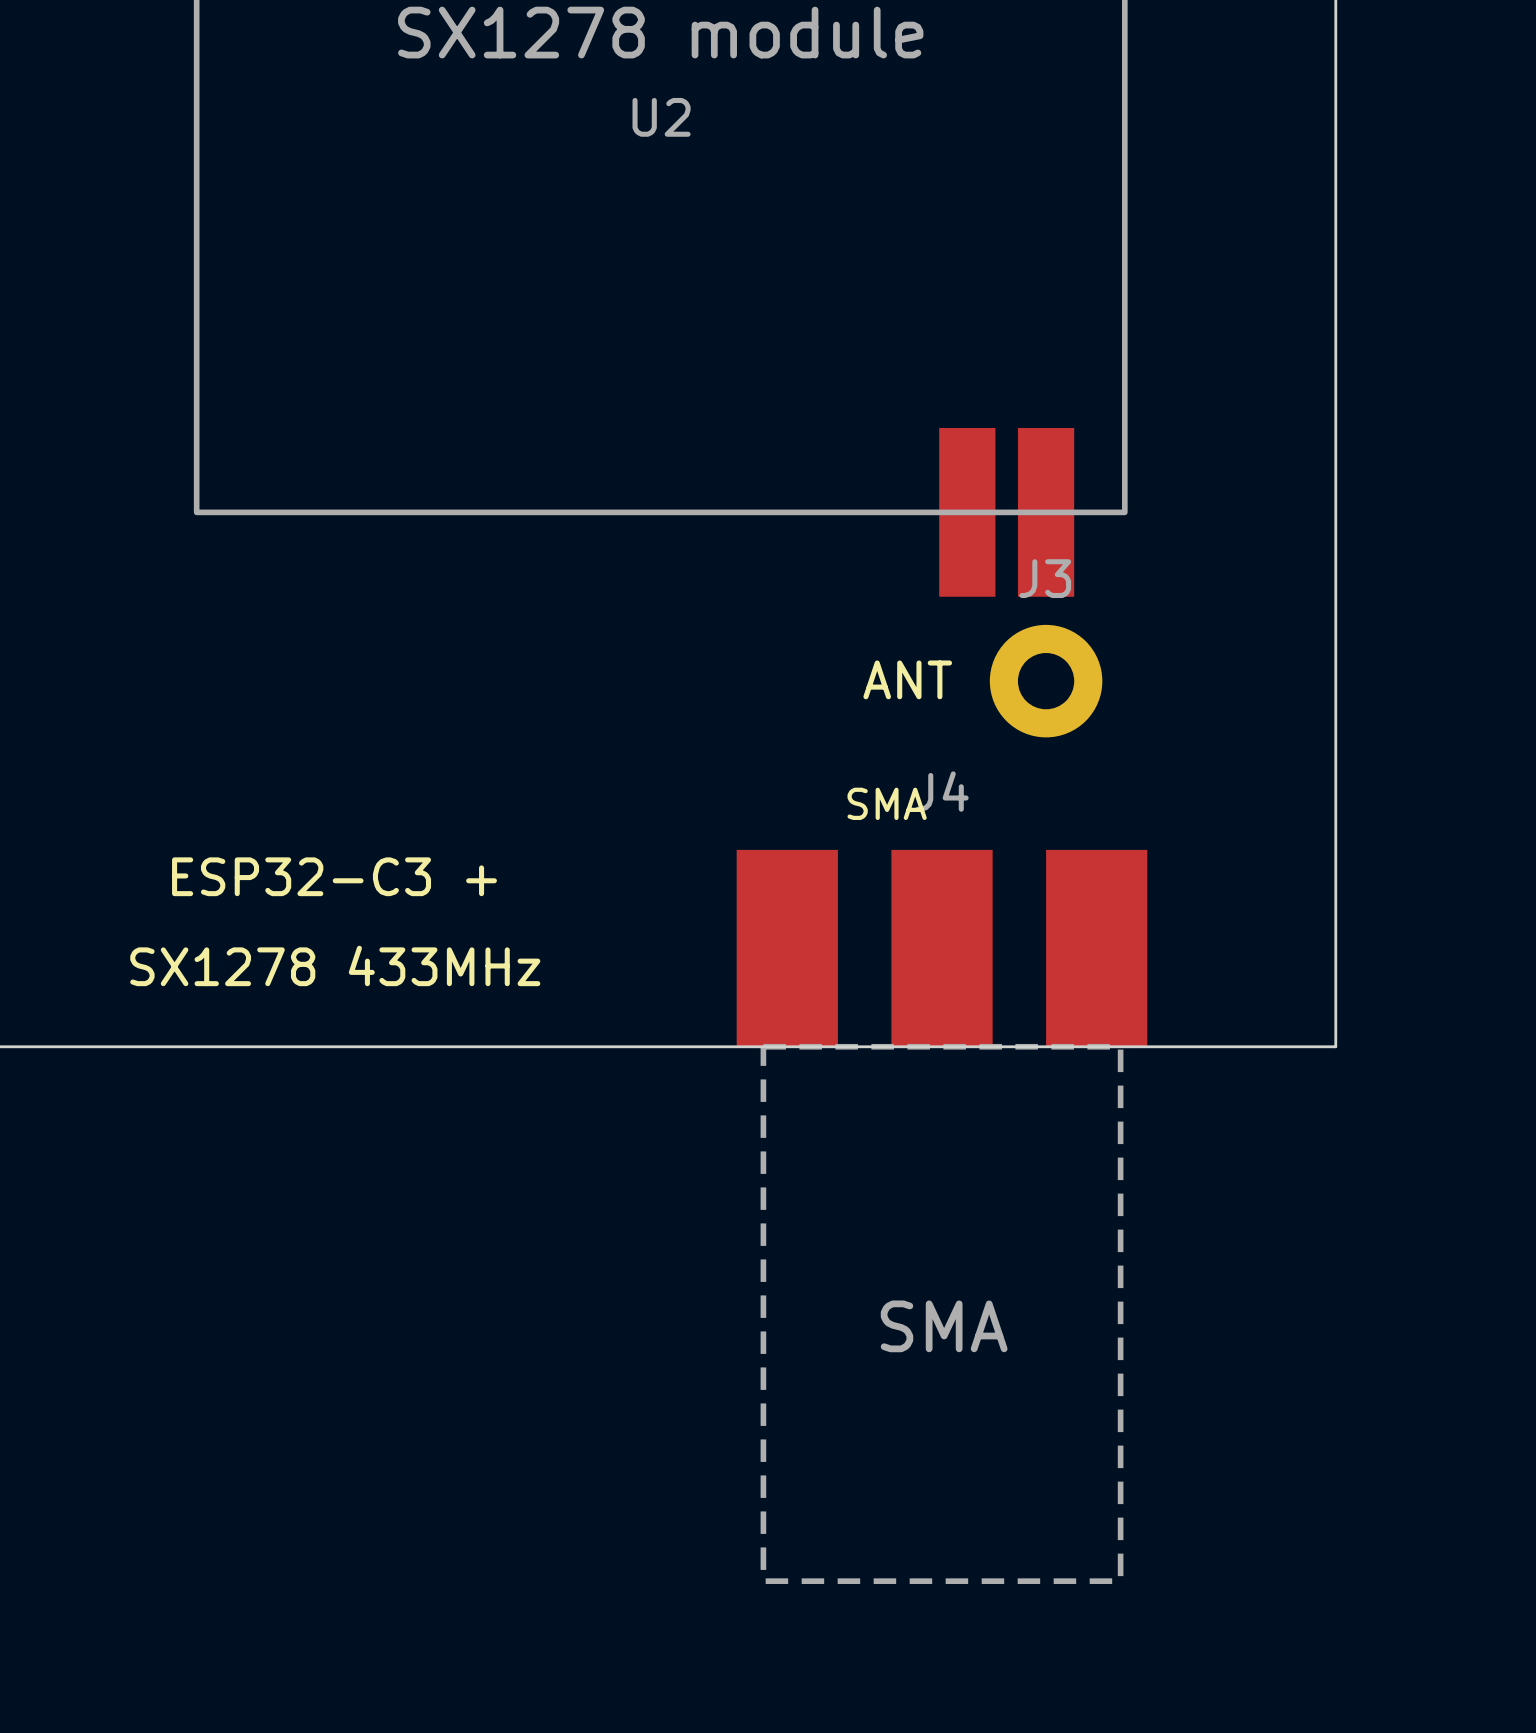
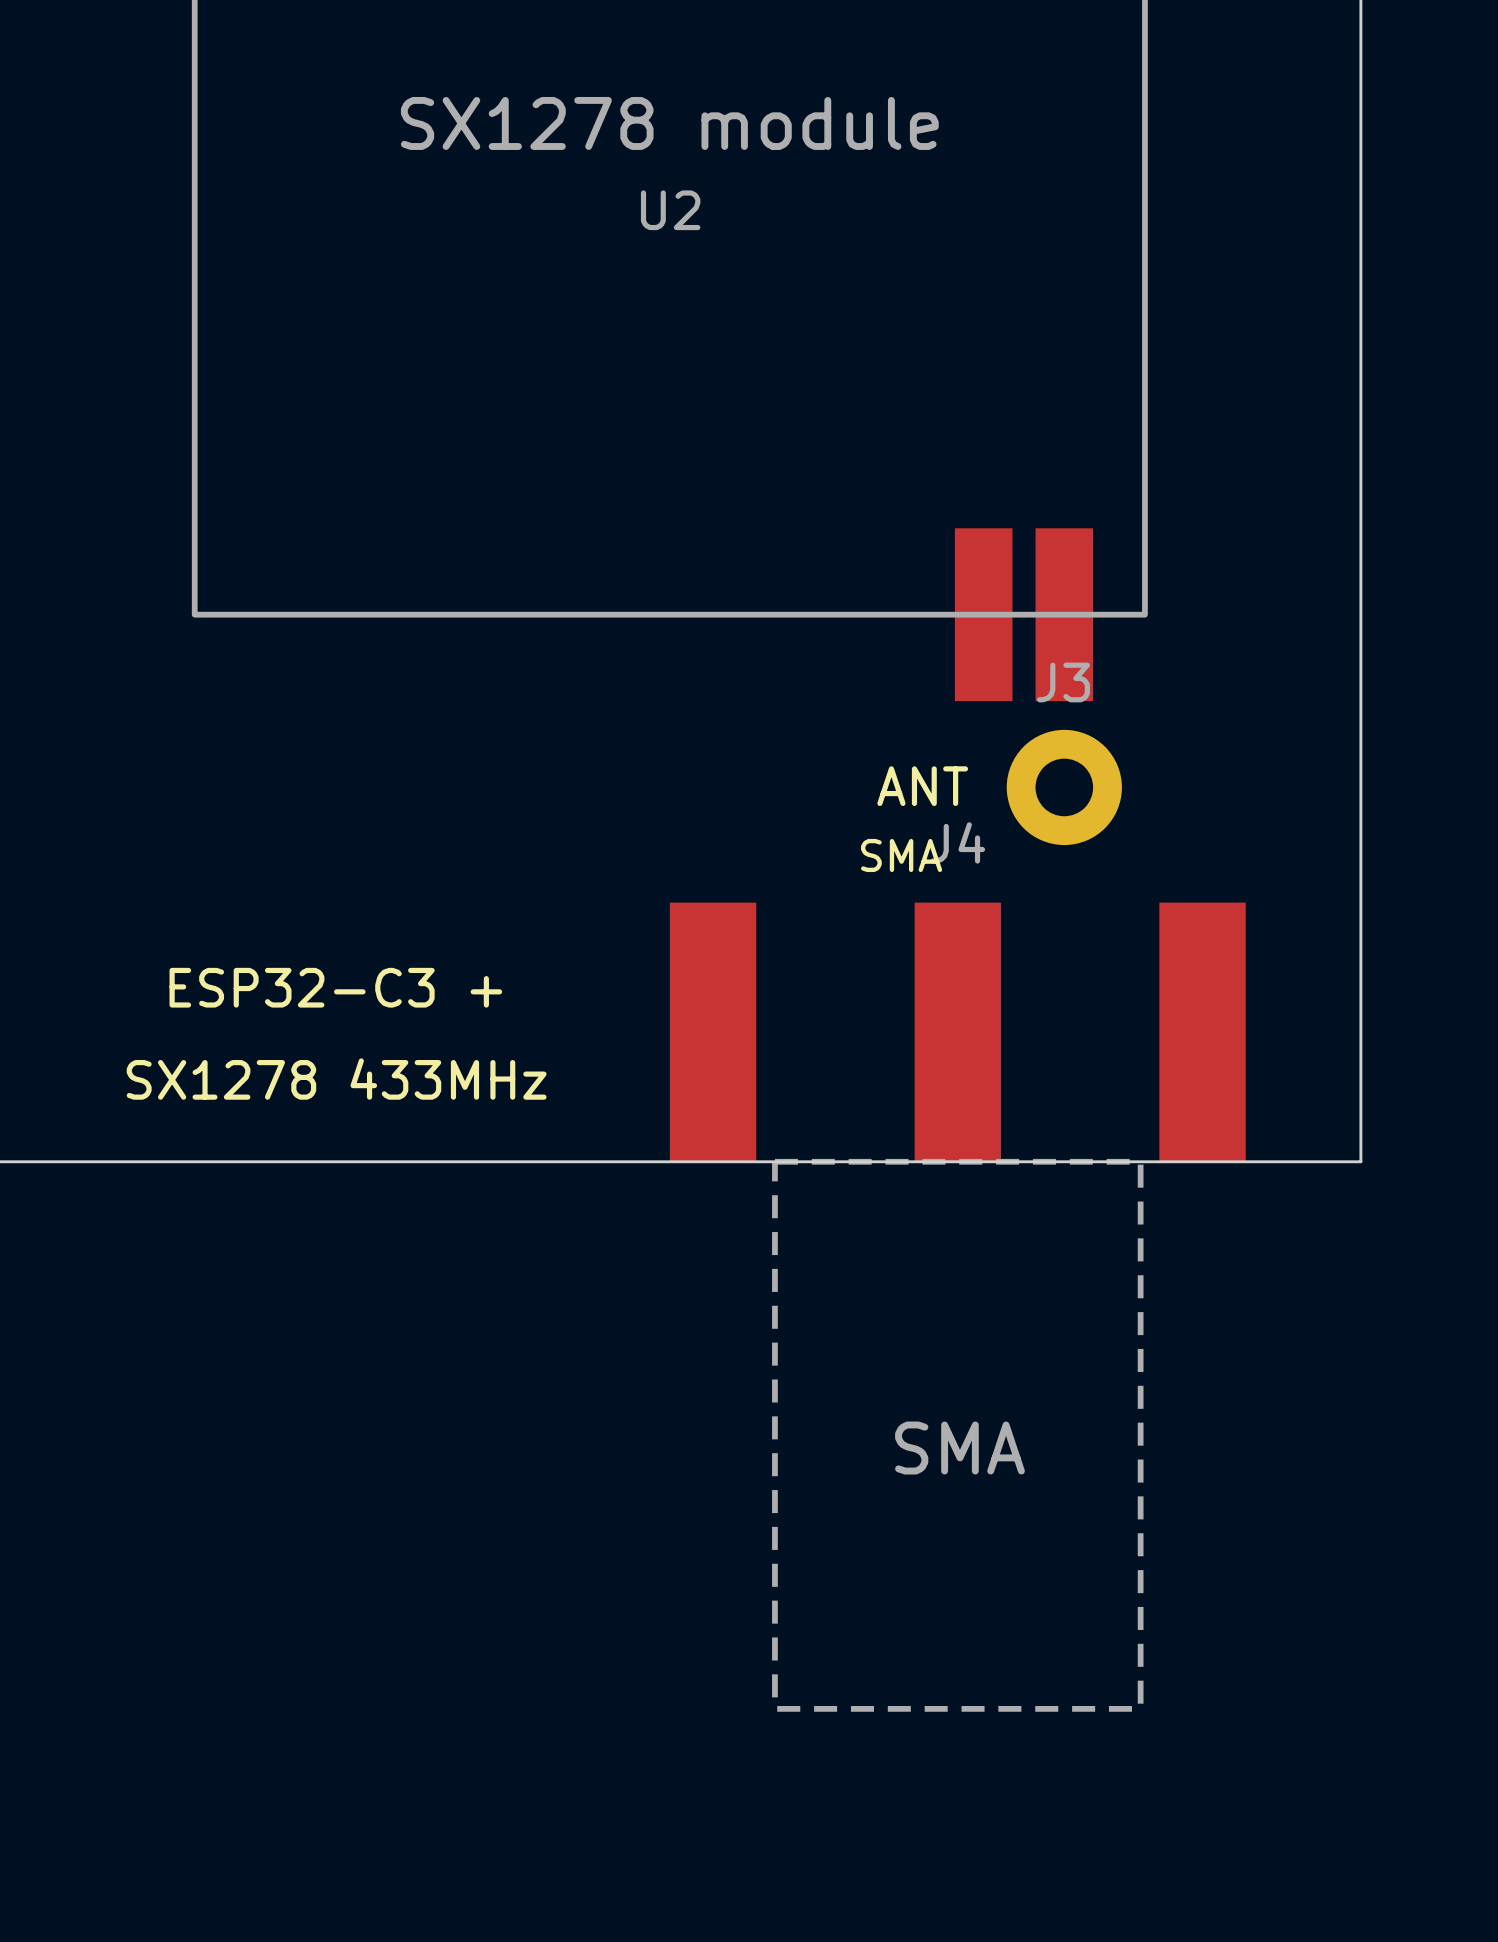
text position: SMA (887, 803) -> SMA (901, 855)
J4 footprint: [736, 849, 1148, 1584] -> [669, 902, 1246, 1712]

